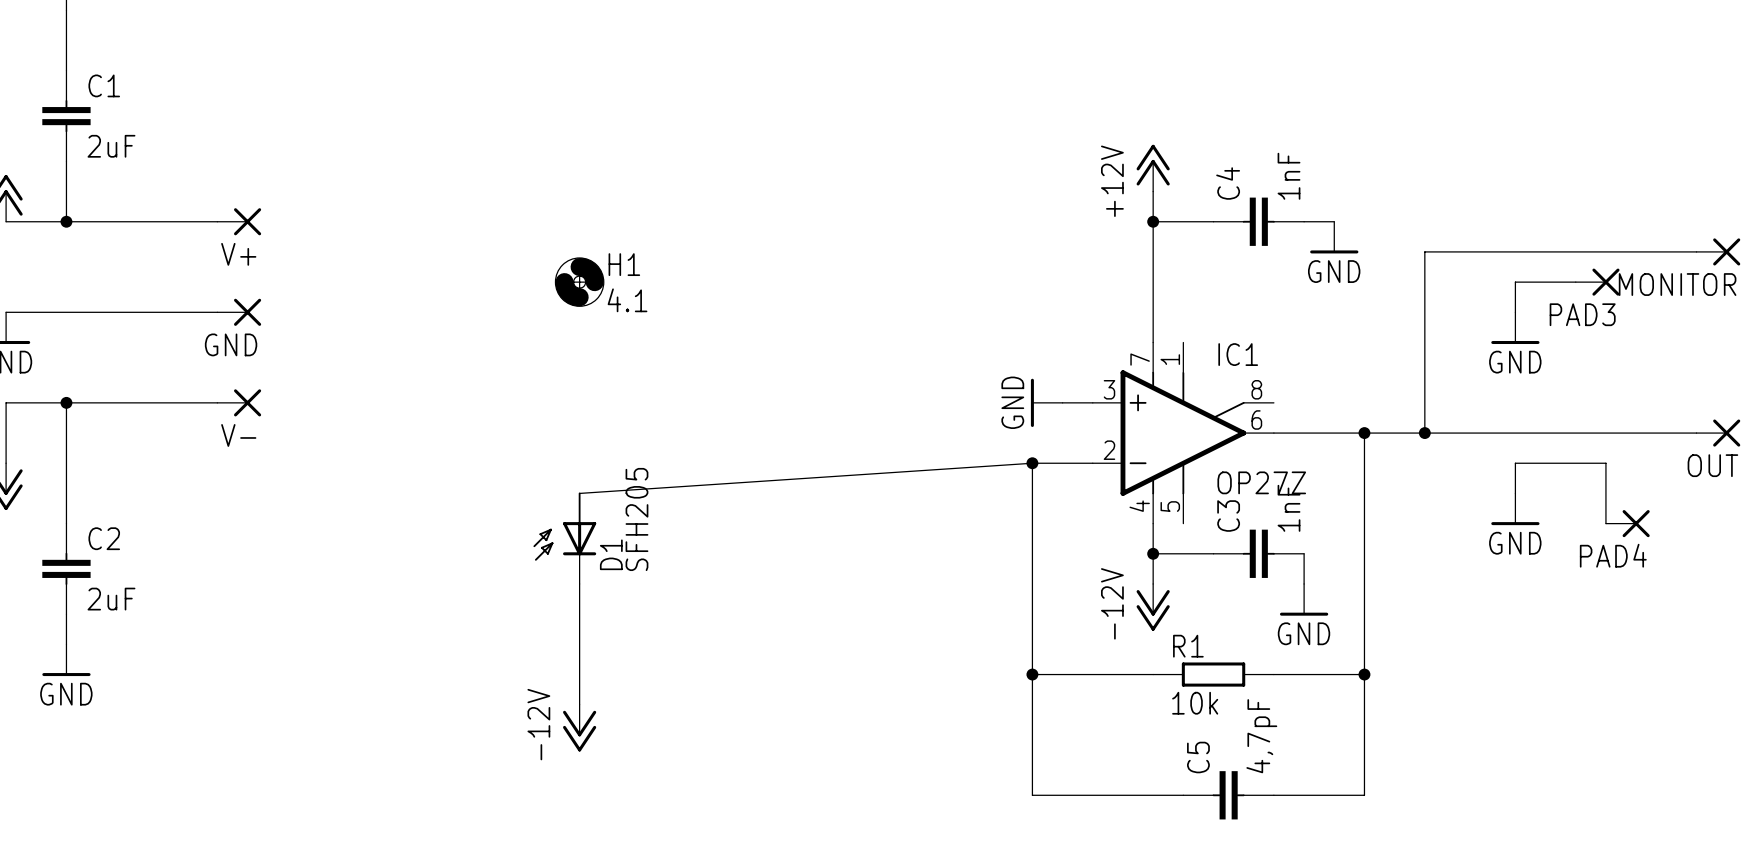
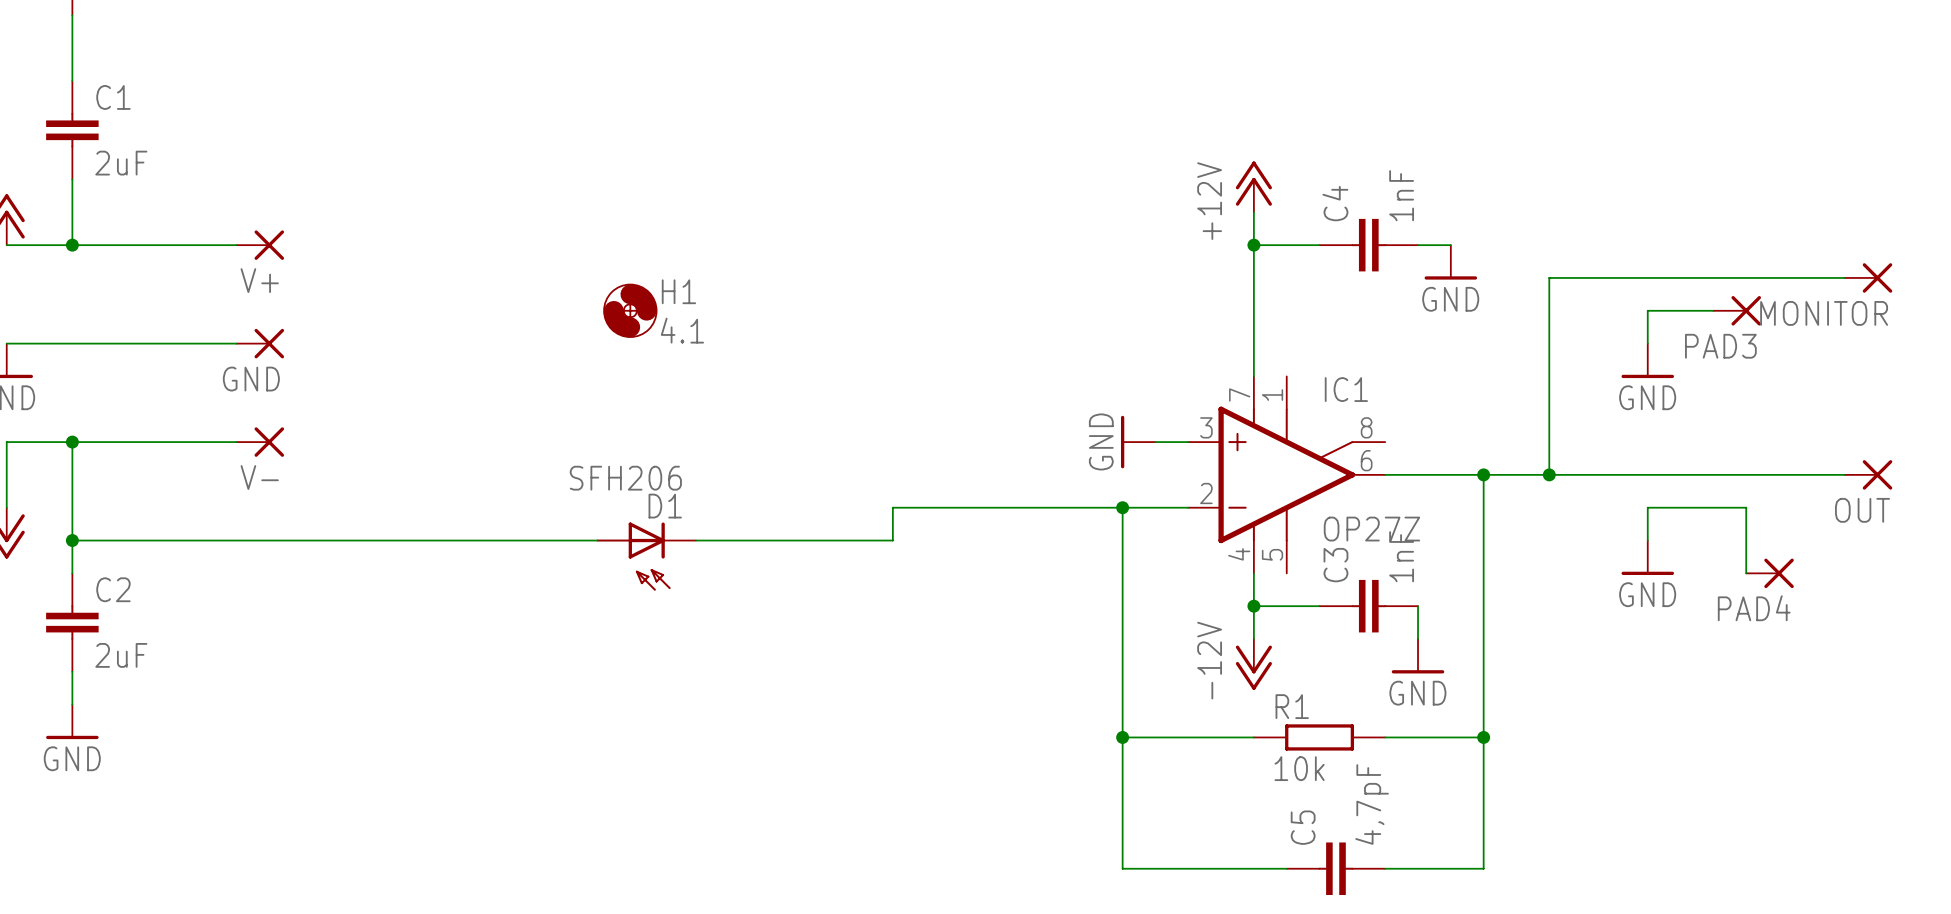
wire: (1032, 463) (579, 493) -> (1122, 507) (892, 507) (892, 540) (695, 540)
wire: none -> (72, 540) (597, 540)
junction: none -> (72, 540)
D1 value: SFH205 (636, 519) -> SFH206 (625, 478)
D1 rotation: 0° (564, 526) -> 90° counterclockwise (633, 556)
wire: (579, 583) (579, 704) -> none
power symbol: -12V (579, 728) -> none

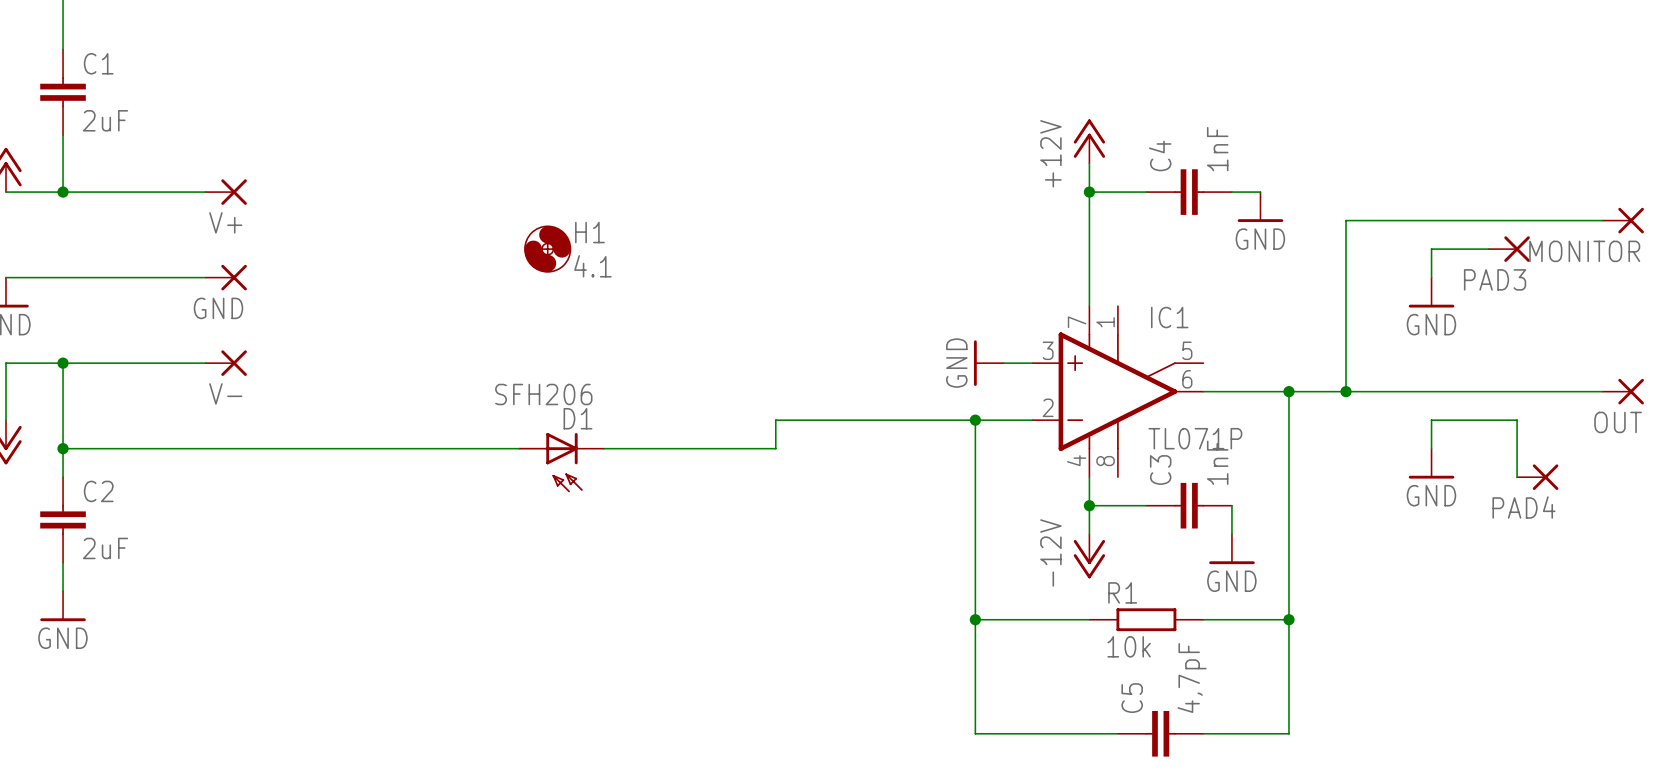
IC1 pin number: 8 (1366, 427) -> 5 (1187, 350)
IC1 value: OP27Z (1371, 529) -> TL071P (1195, 438)
IC1 pin number: 5 (1272, 554) -> 8 (1105, 461)

